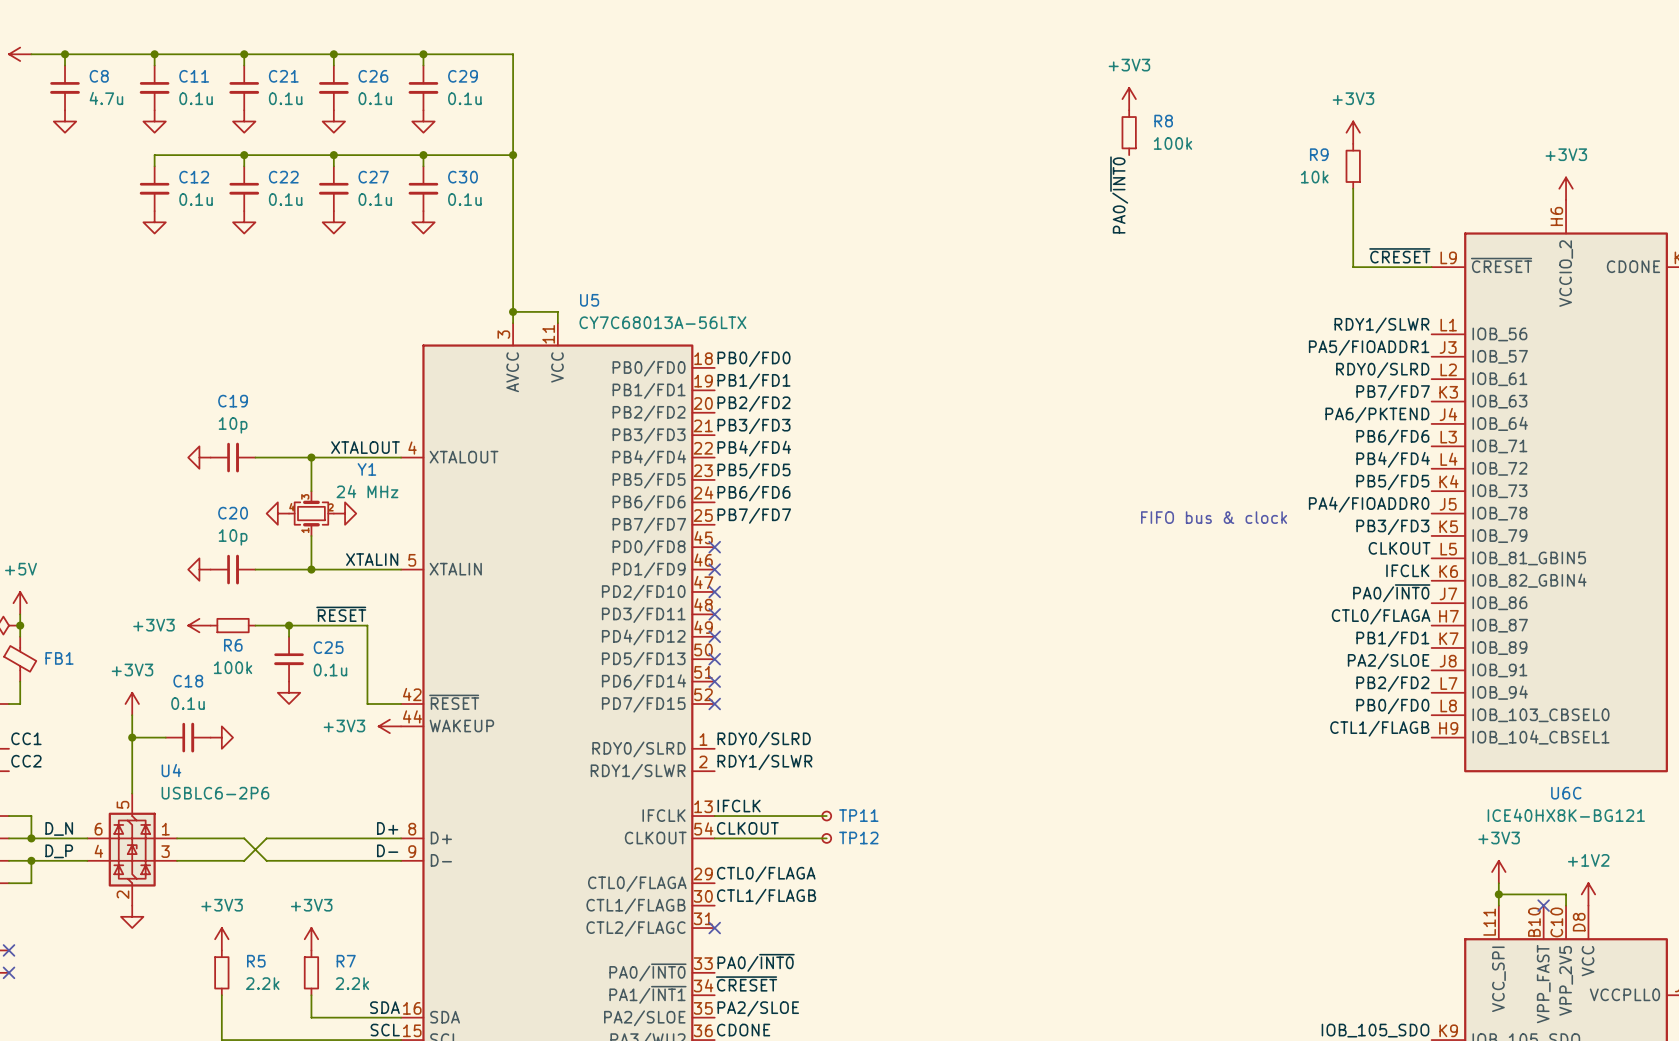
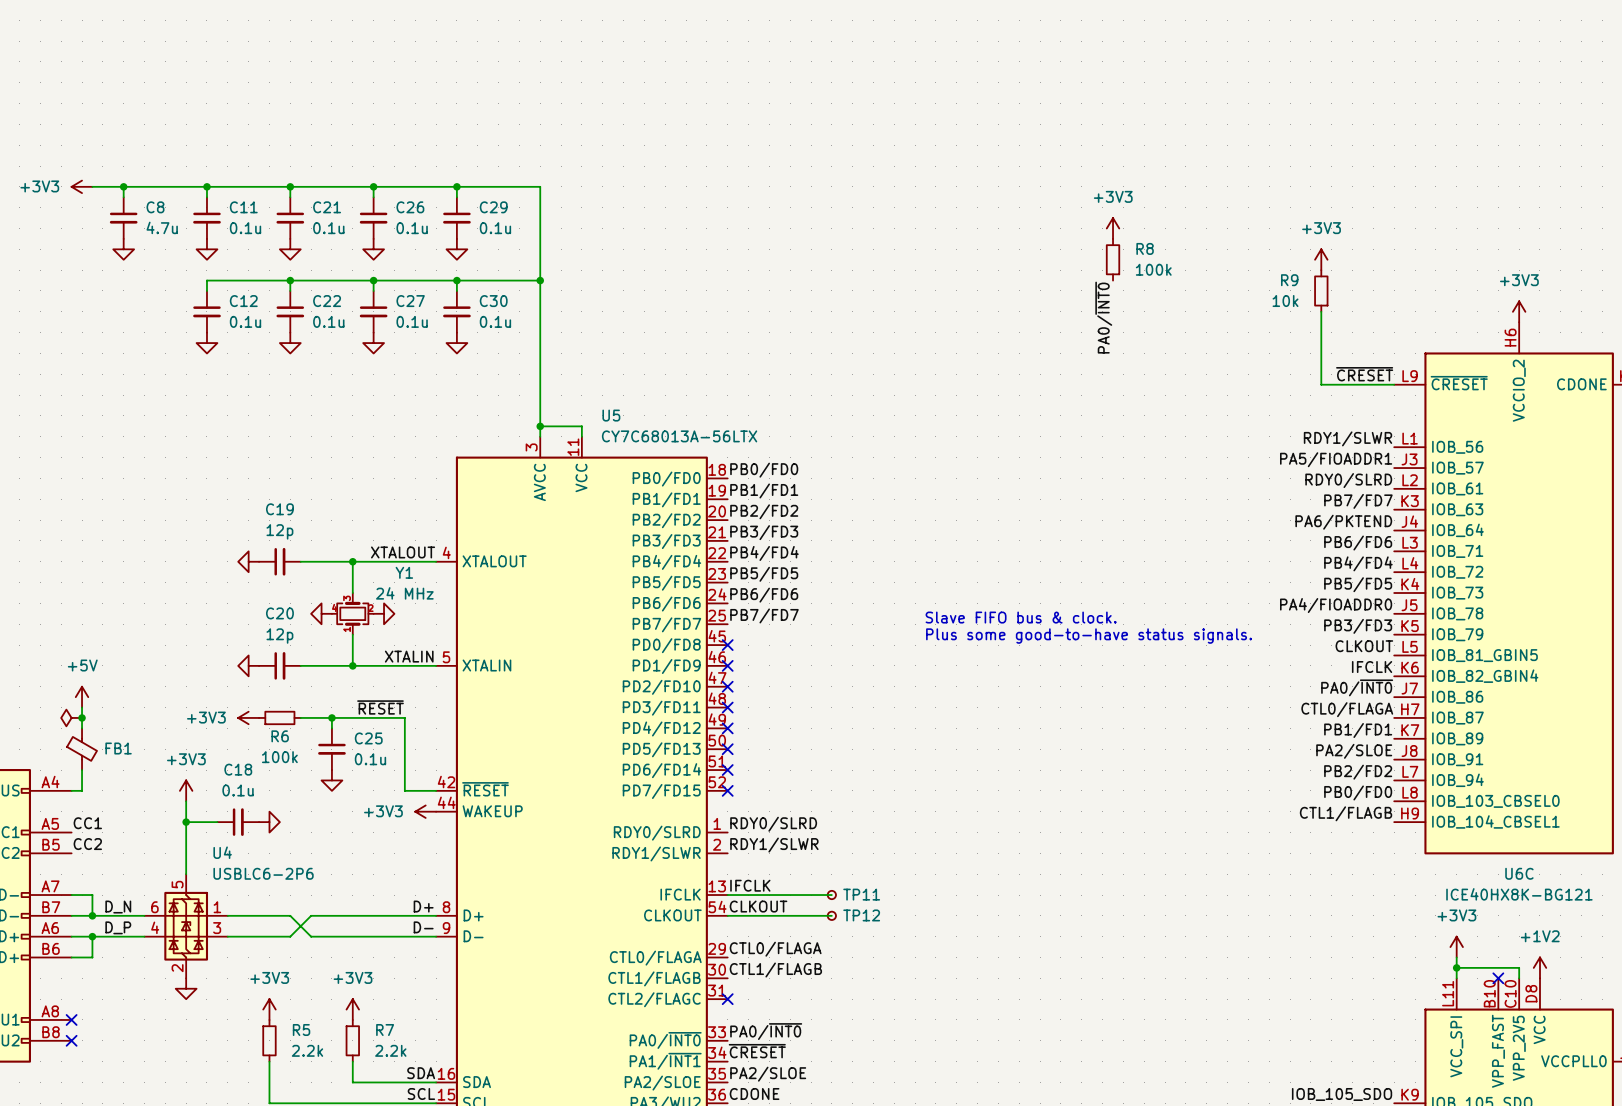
C19 value: 10p (233, 425) -> 12p (279, 531)
text: FIFO bus & clock (1214, 517) -> Slave FIFO bus & clock. (1021, 617)
C20 value: 10p (233, 537) -> 12p (279, 636)
text: none -> Plus some good-to-have status signals. (1089, 636)

